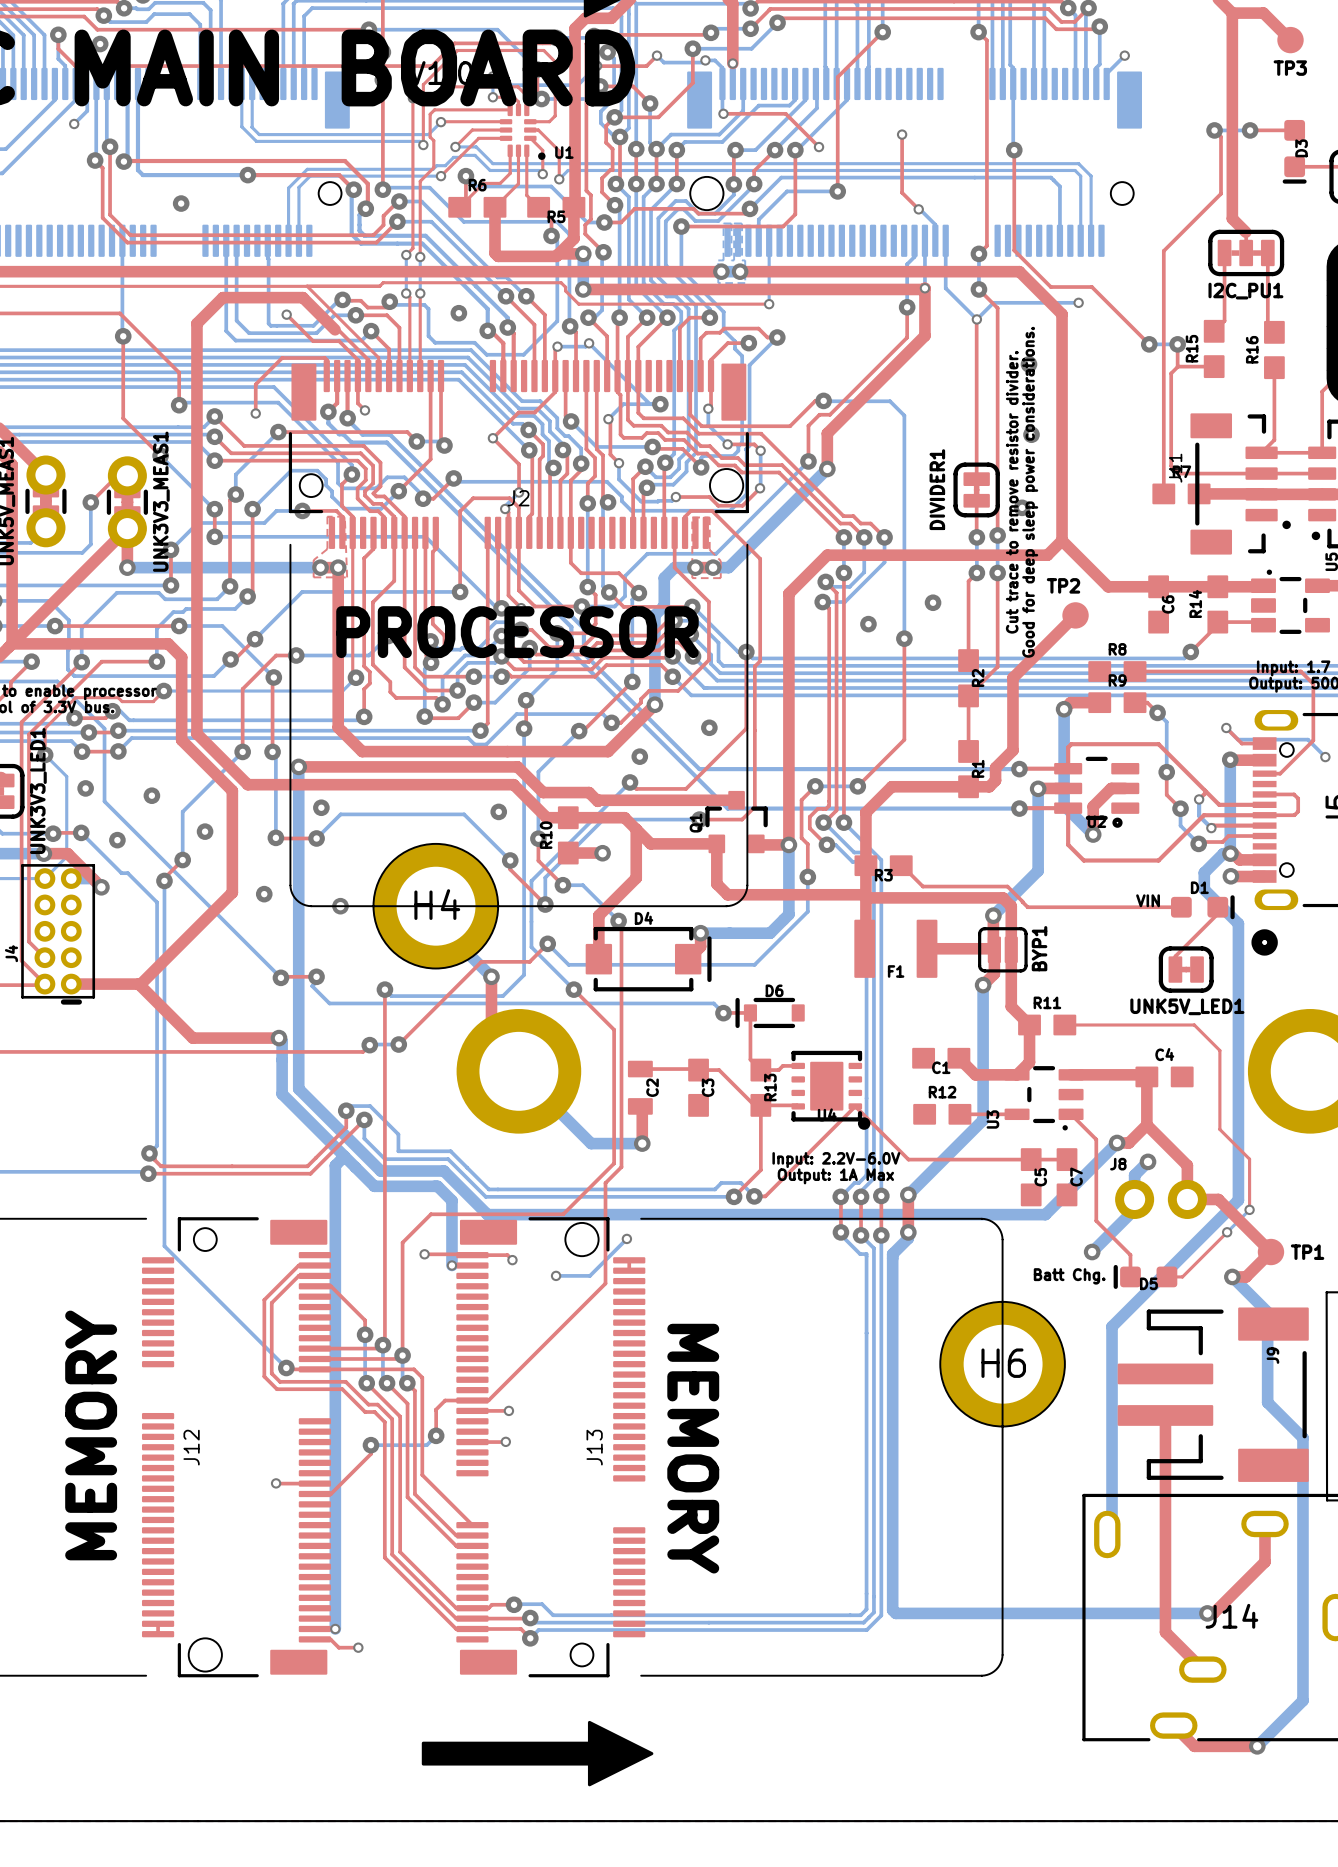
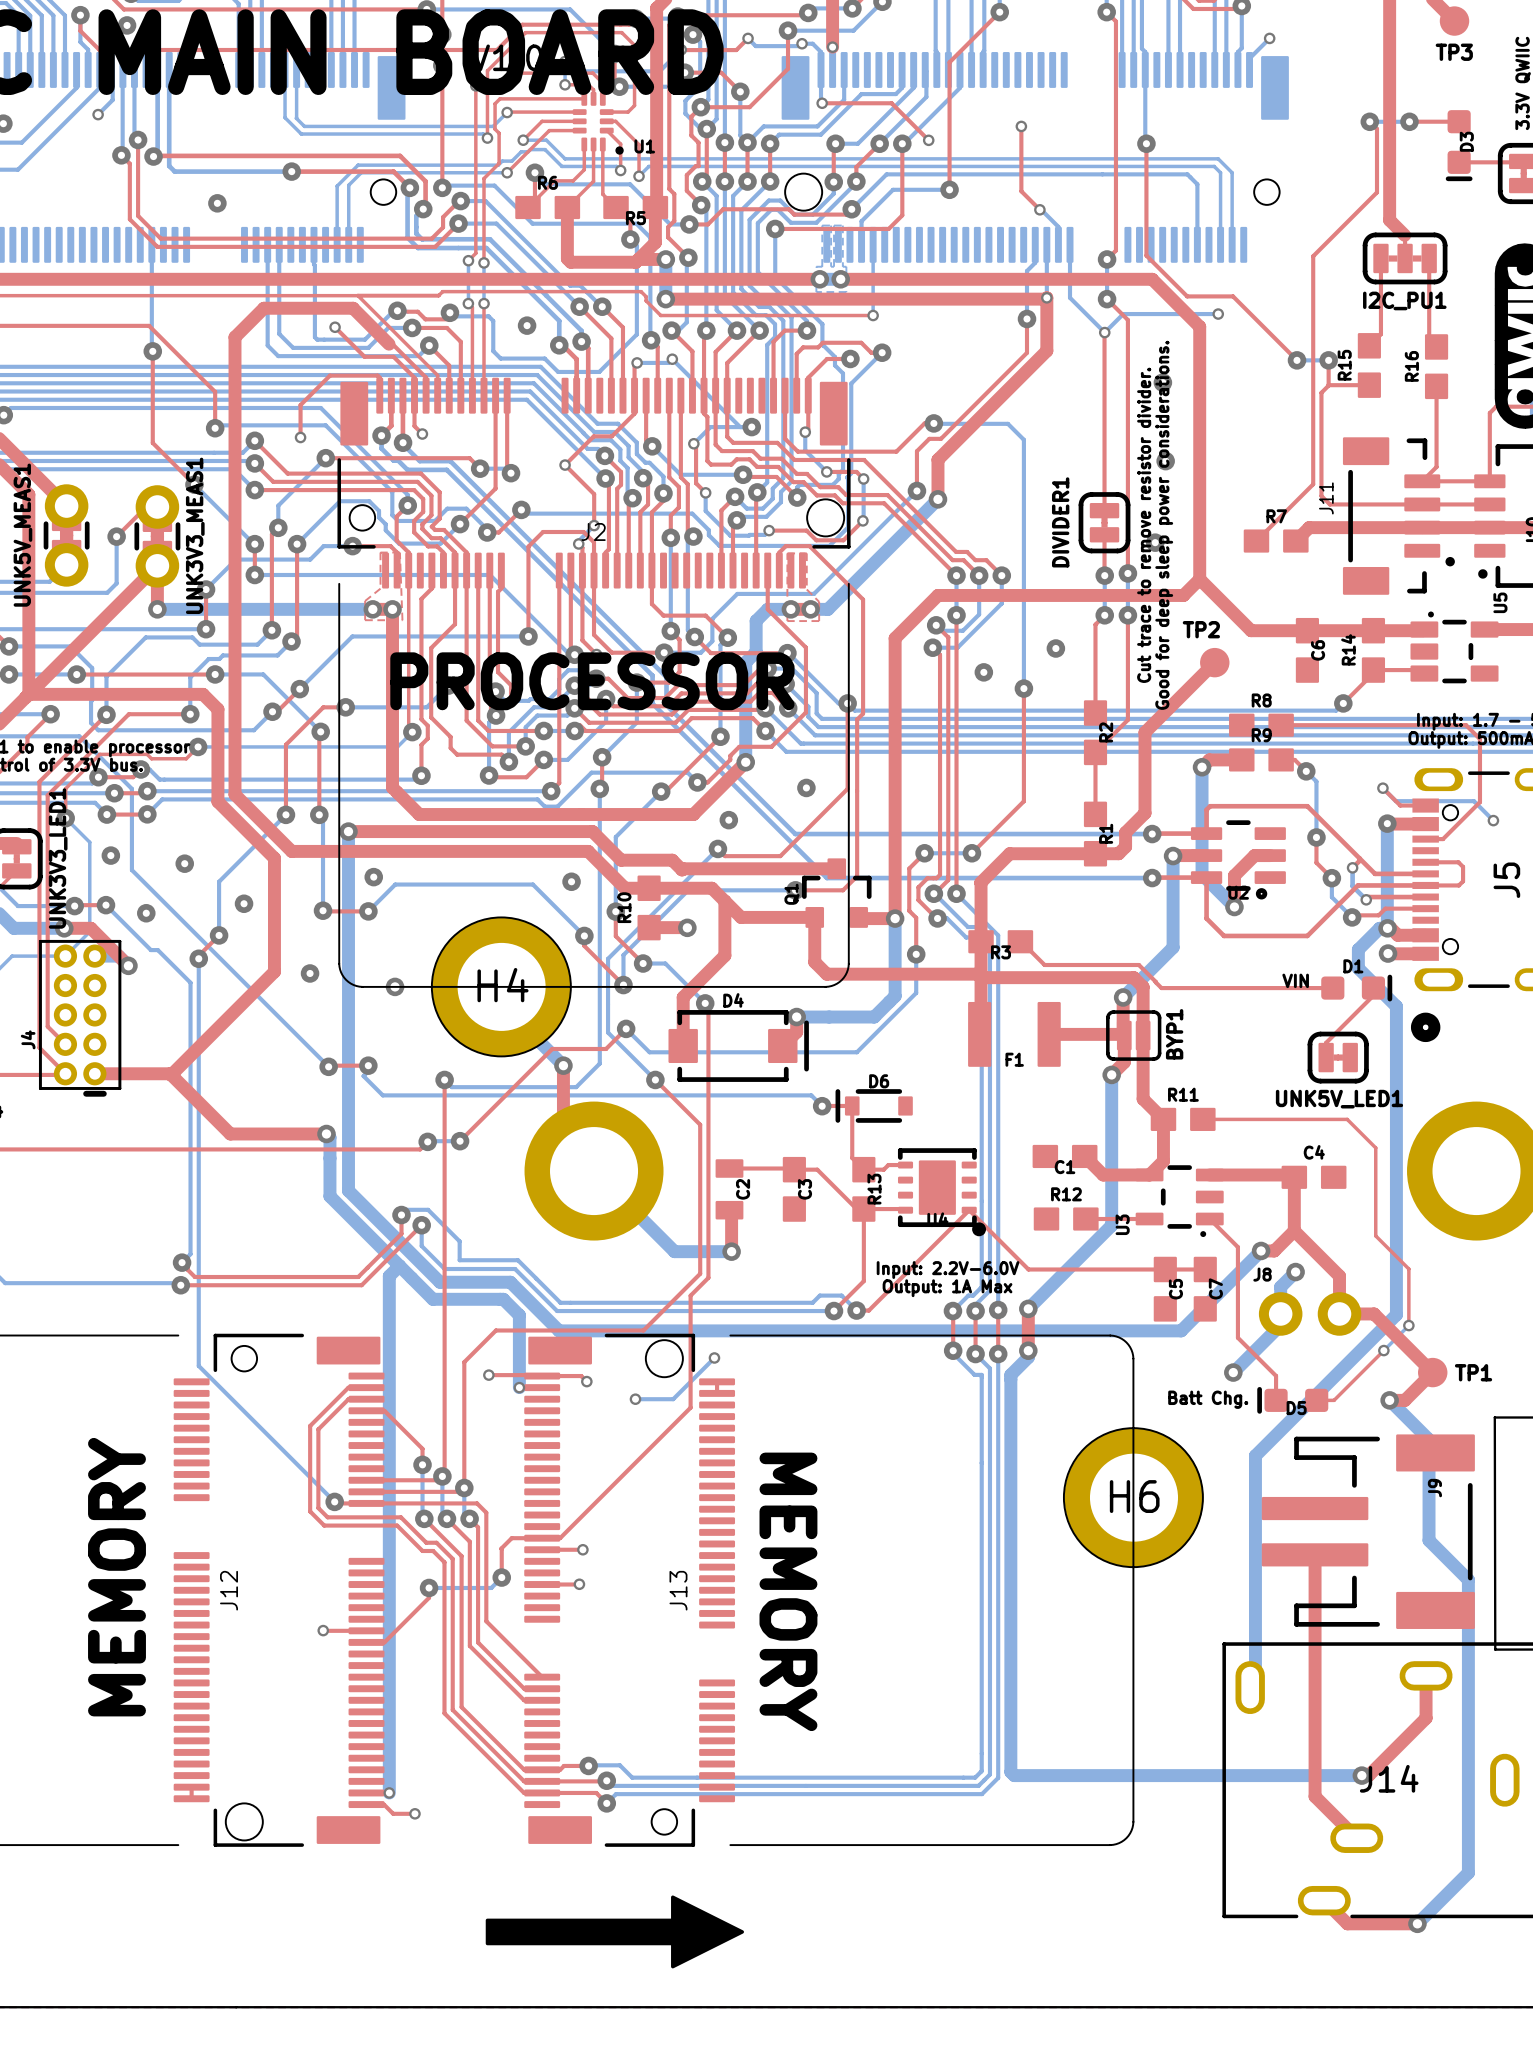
top track: (1163, 455) (1163, 493) -> (1313, 484) (1256, 541)
R7 position: (1181, 493) -> (1276, 541)
top track: (1199, 493) (1261, 494) -> (1295, 541) (1309, 527) (1422, 527)

